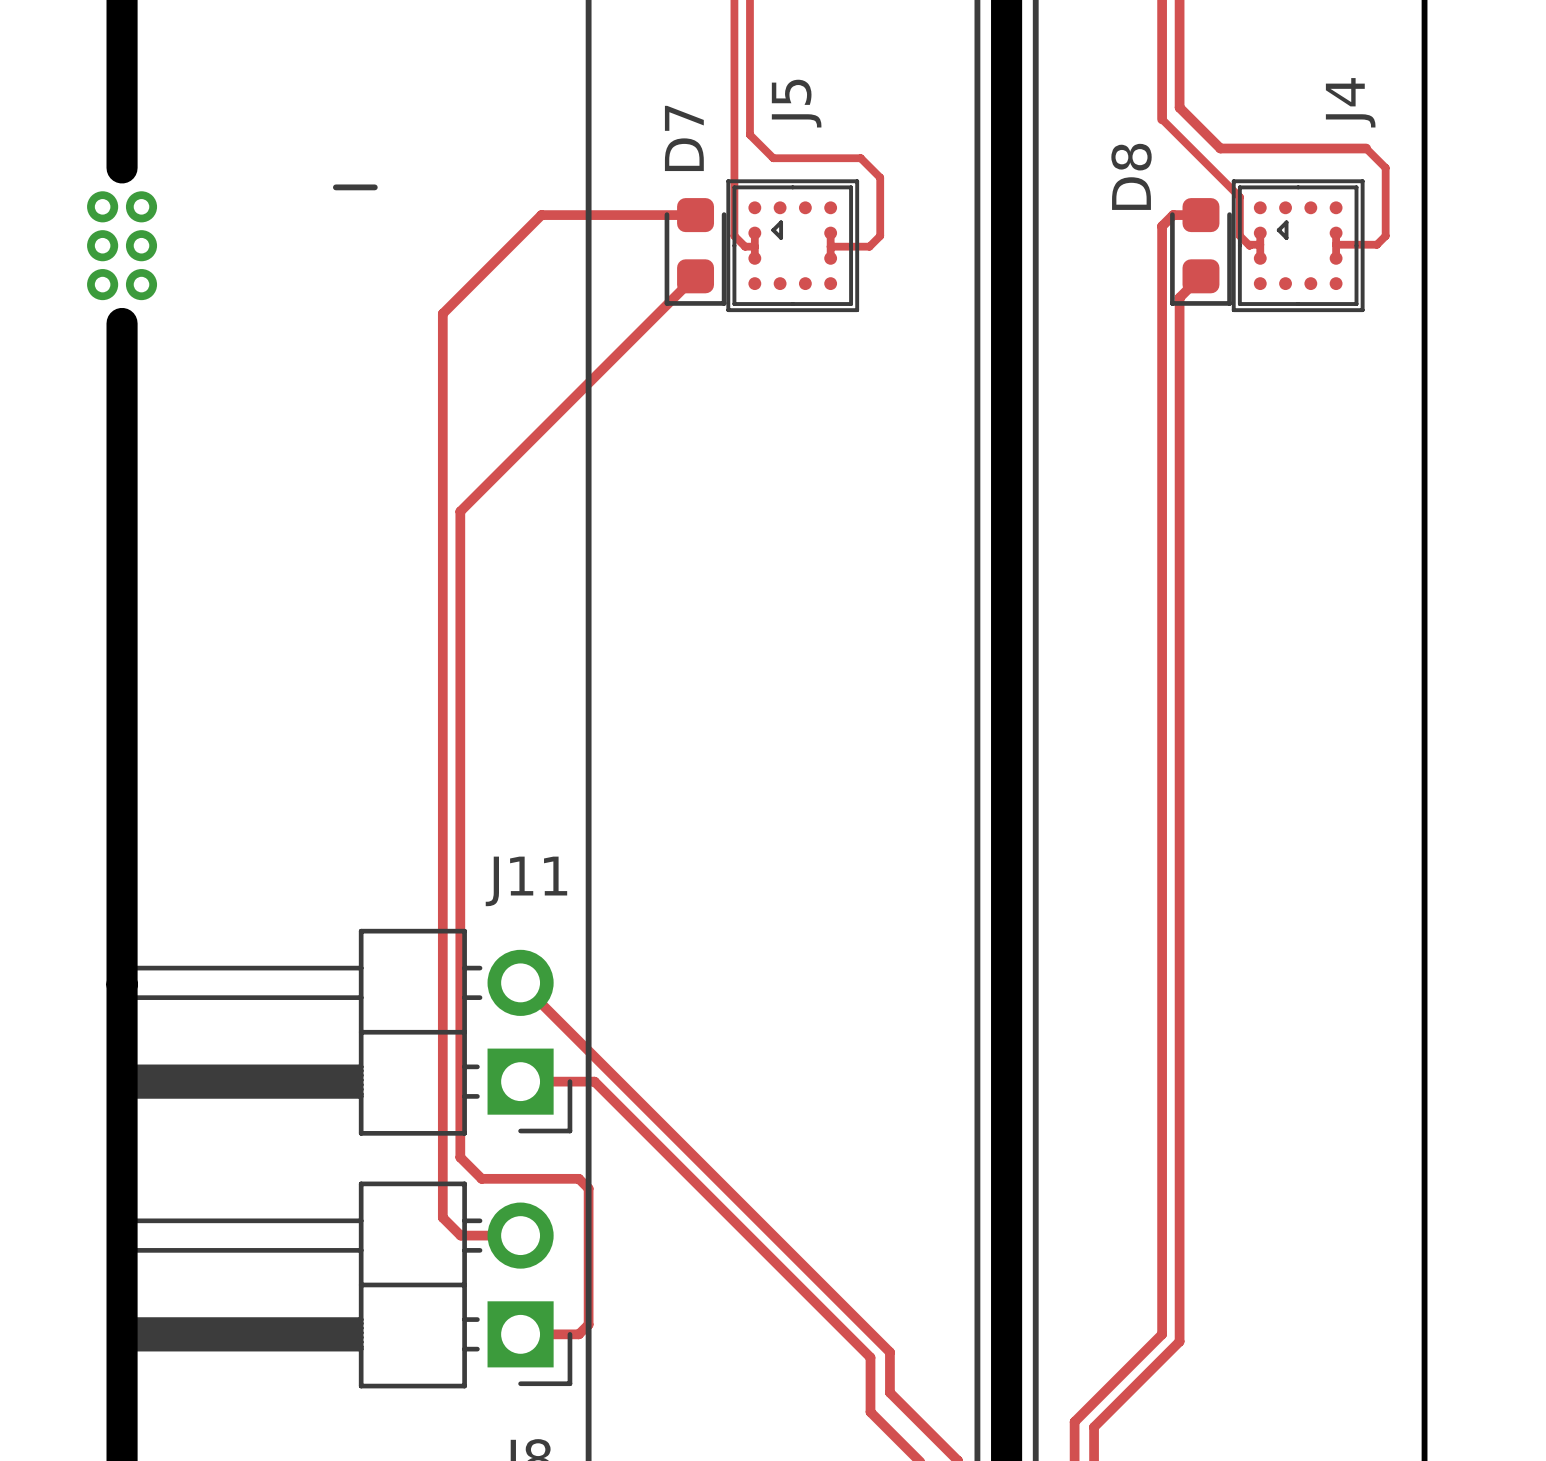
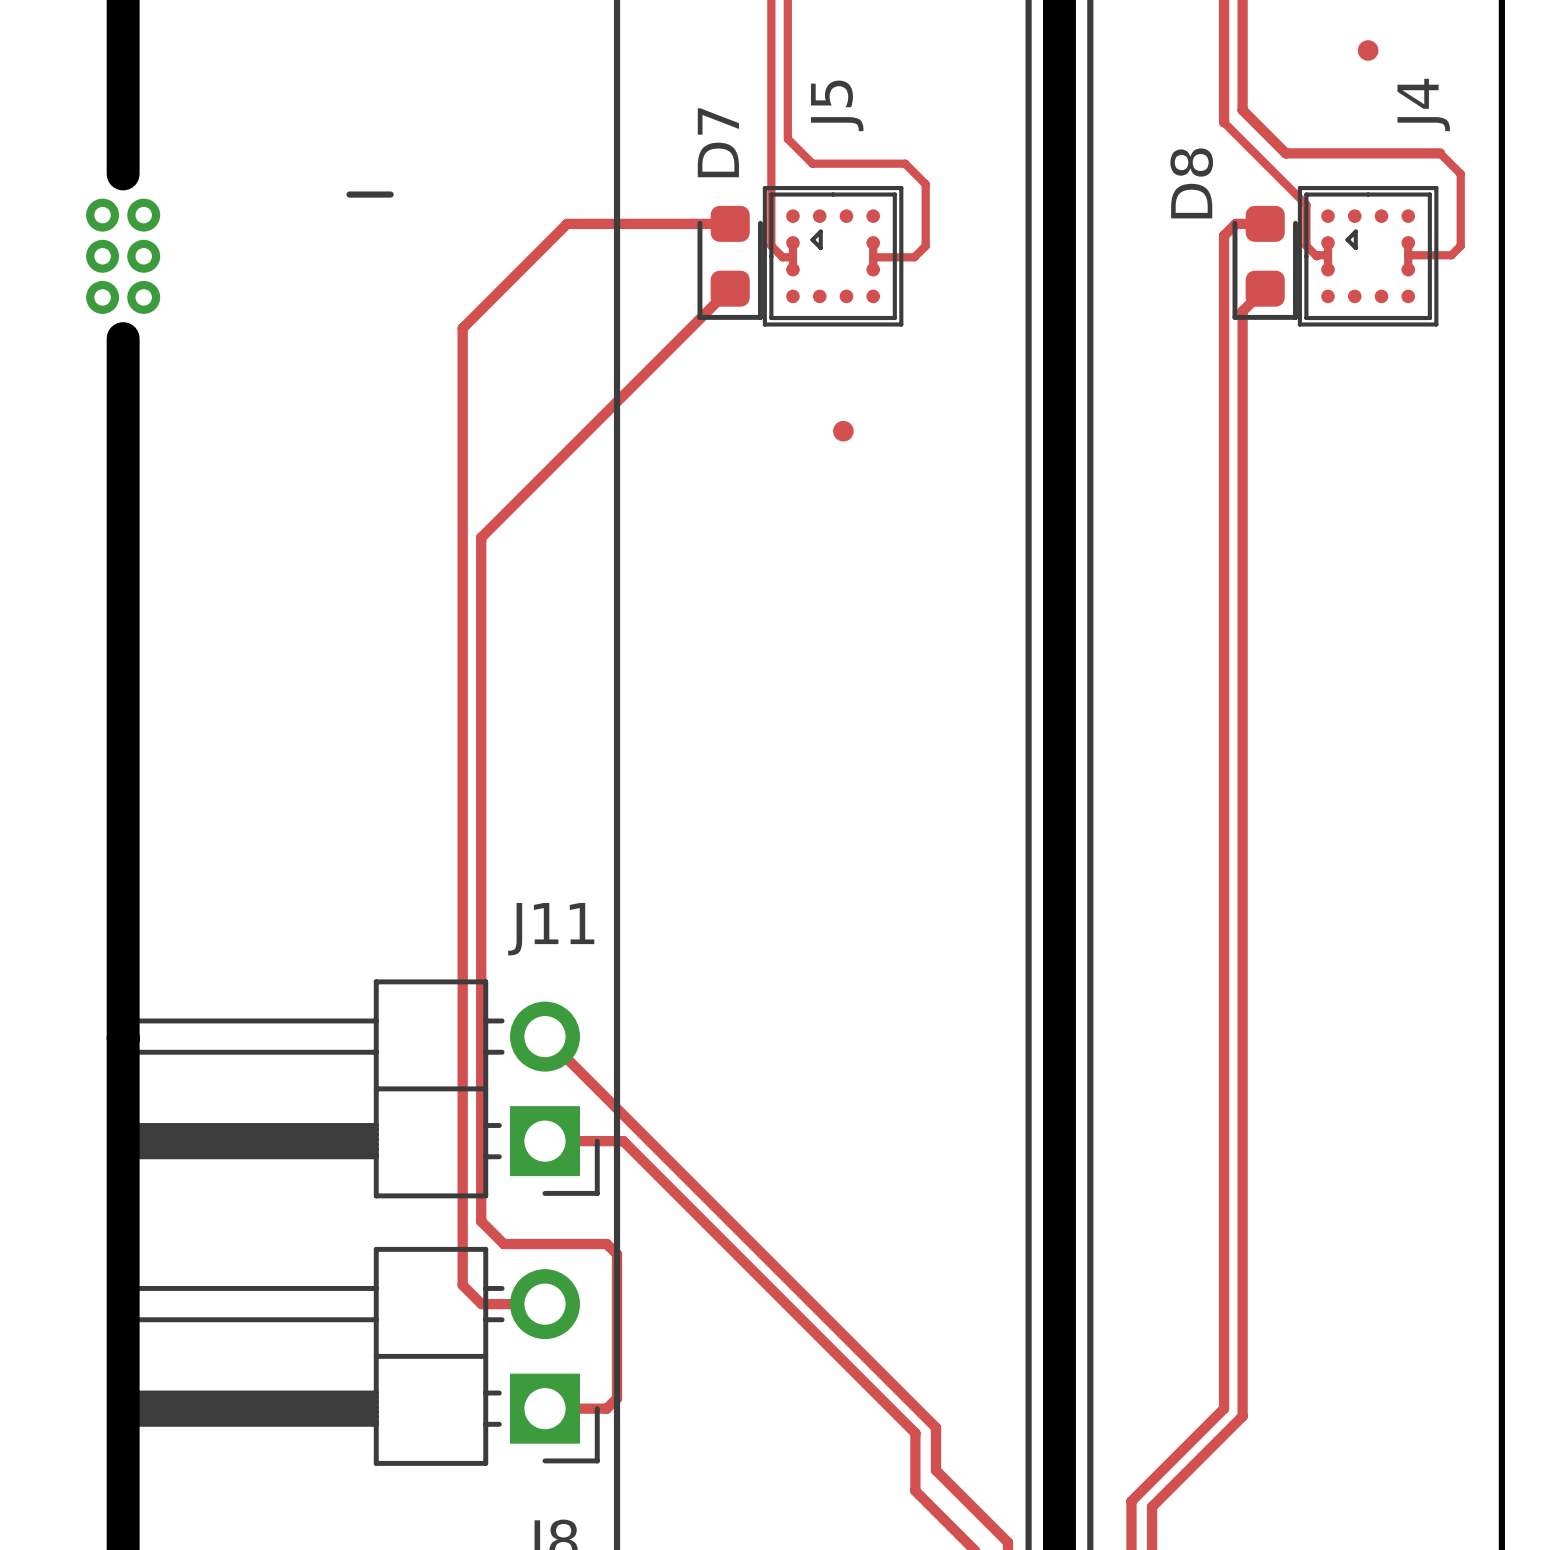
part: none -> (1368, 50)
part: none -> (843, 431)

